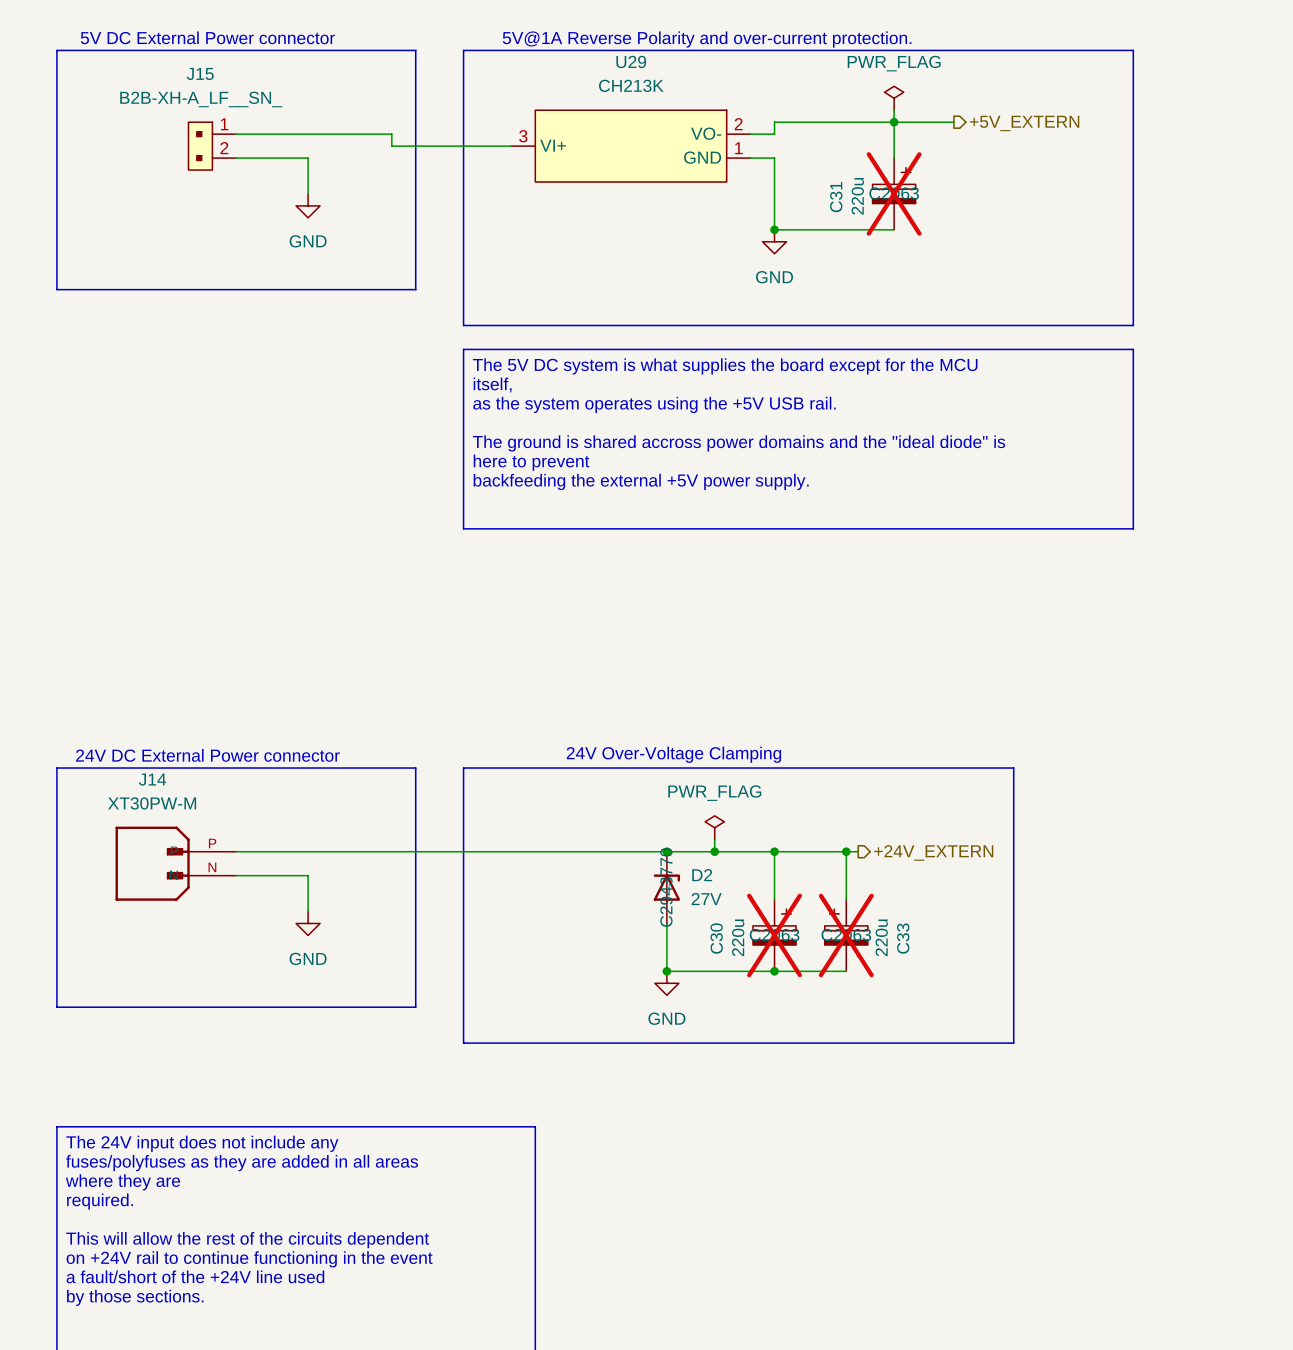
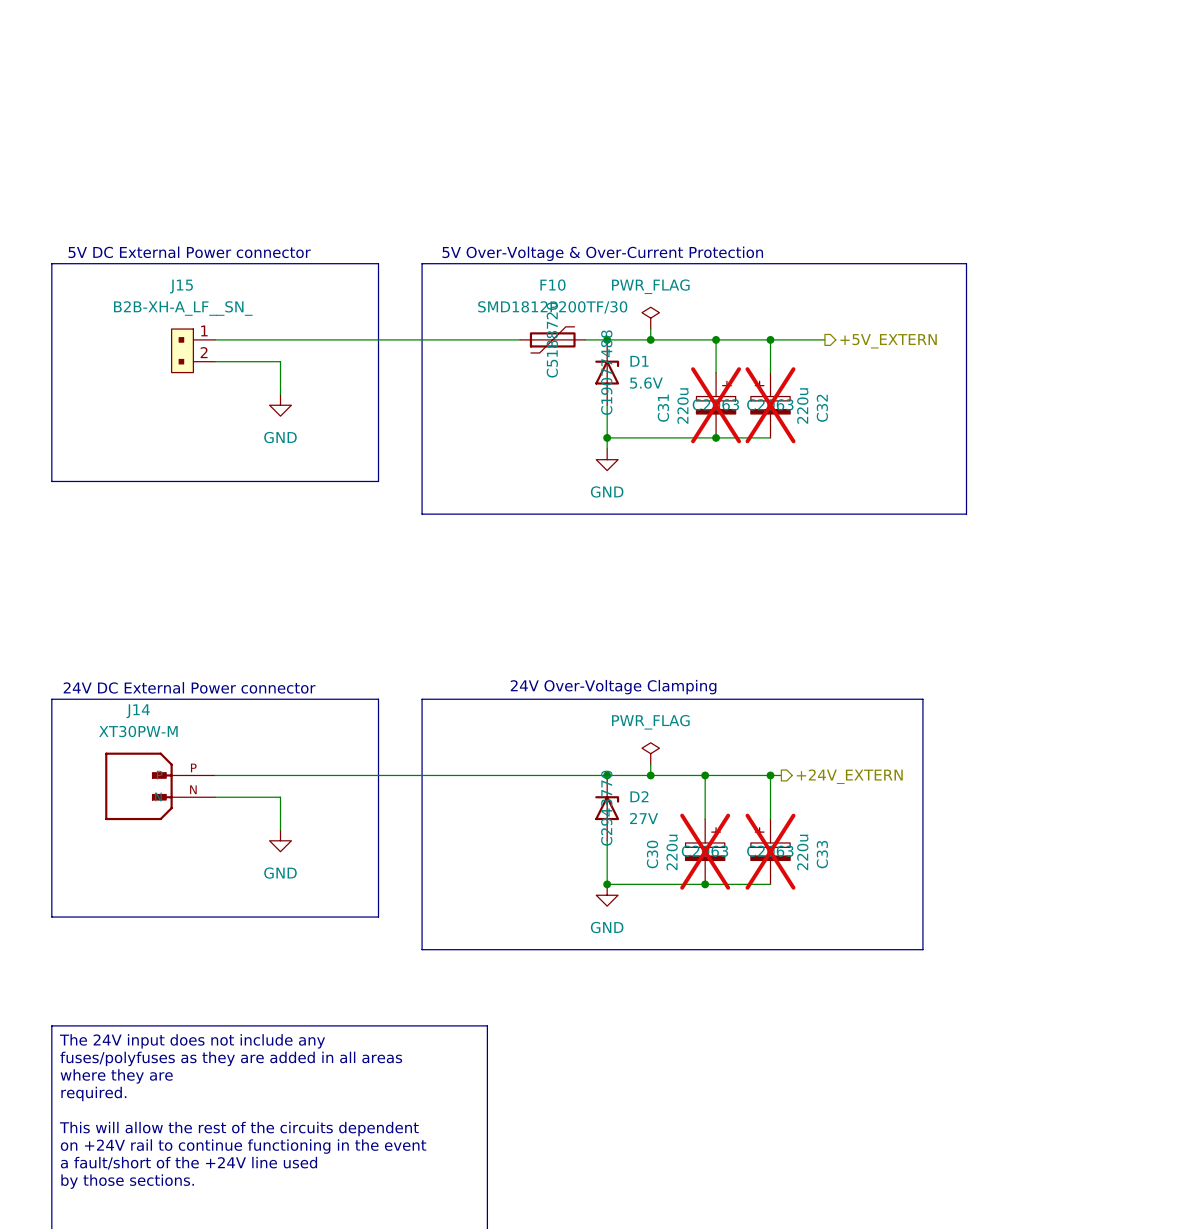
text: 5V DC External Power connector (207, 37) -> none
text: 5V@1A Reverse Polarity and over-current protection. (707, 39) -> none
power symbol: PWR_FLAG (894, 98) -> none
wire: (894, 110) (894, 158) -> none
junction: (894, 122) -> none
wire: (953, 122) (774, 122) (774, 134) (750, 134) -> none
hierarchical label: +5V_EXTERN (1024, 123) -> none
wire: (236, 134) (391, 134) (391, 146) (511, 146) -> none
J15 position: (212, 146) -> (193, 350)
U29: CH213K (631, 146) -> none
wire: (236, 158) (308, 158) (308, 193) -> none
wire: (750, 158) (774, 158) (774, 229) (894, 229) -> none
C31 position: (894, 193) -> (716, 405)
power symbol: GND (308, 205) -> none
junction: (774, 229) -> none
power symbol: GND (774, 241) -> none
text: none -> 5V DC External Power connector (189, 252)
text: none -> 5V Over-Voltage & Over-Current Protection (602, 253)
line: (56, 289) (56, 50) (415, 50) (415, 289) -> (51, 263) (51, 481) (378, 481) (378, 263)
line: (463, 289) (463, 50) (1133, 50) (1133, 325) (463, 325) -> (422, 318) (422, 296)
line: (463, 349) (1133, 349) (1133, 528) (463, 528) -> (422, 263) (966, 263) (966, 514) (422, 514) (422, 481)
power symbol: none -> PWR_FLAG (650, 318)
text: The 5V DC system is what supplies the board except for the MCU (725, 366) -> none
wire: none -> (215, 339) (520, 339)
F10: none -> SMD1812P200TF/30 (552, 339)
wire: none -> (585, 339) (824, 339)
junction: none -> (607, 339)
junction: none -> (650, 339)
wire: none -> (716, 339) (716, 372)
junction: none -> (716, 339)
wire: none -> (770, 339) (770, 372)
junction: none -> (770, 339)
hierarchical label: none -> +5V_EXTERN (888, 341)
text: itself, (492, 384) -> none
wire: none -> (215, 361) (280, 361) (280, 394)
text: as the system operates using the +5V USB rail. (654, 404) -> none
D1: none -> 5.6V (607, 372)
text: The ground is shared accross power domains and the "ideal diode" is (739, 443) -> none
power symbol: none -> GND (280, 405)
wire: none -> (607, 405) (607, 448)
C32: none -> 220u (770, 405)
text: here to prevent (531, 462) -> none
wire: none -> (607, 437) (770, 437)
junction: none -> (607, 437)
junction: none -> (716, 437)
text: backfeeding the external +5V power supply. (641, 481) -> none
power symbol: none -> GND (607, 459)

